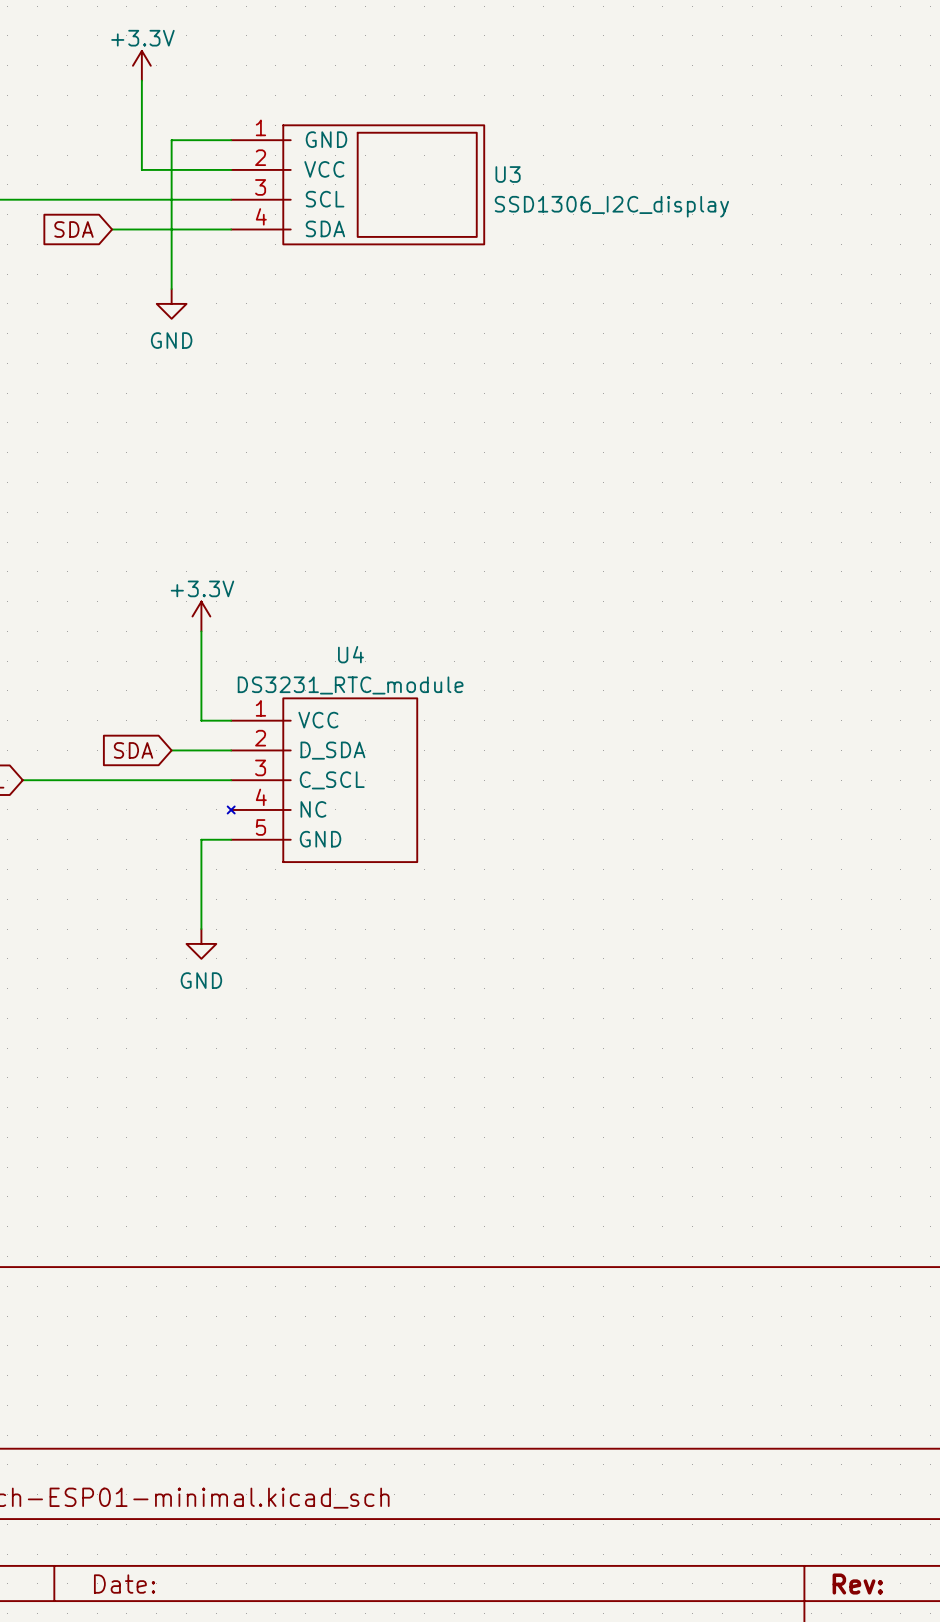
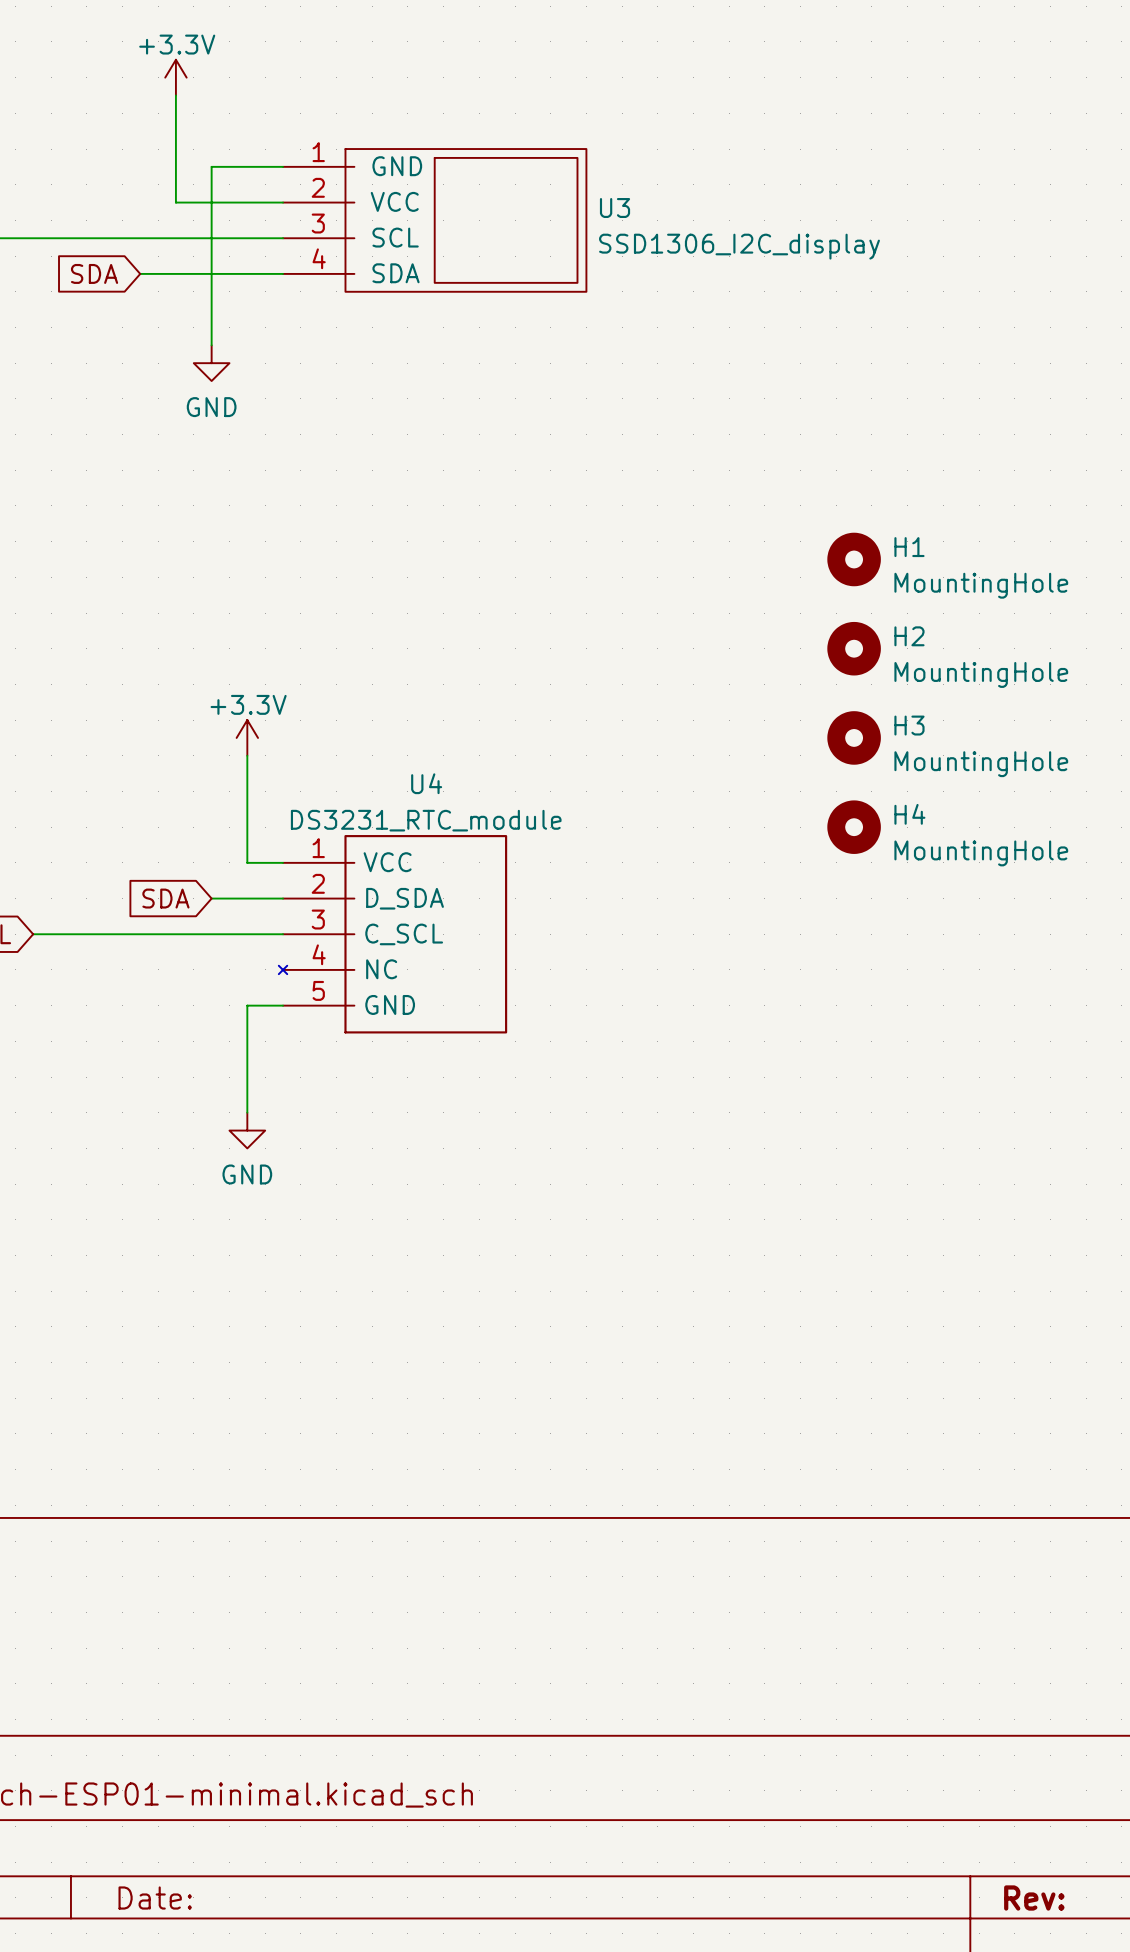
H1: none -> MountingHole (854, 559)
H2: none -> MountingHole (854, 648)
H3: none -> MountingHole (854, 737)
H4: none -> MountingHole (854, 827)

